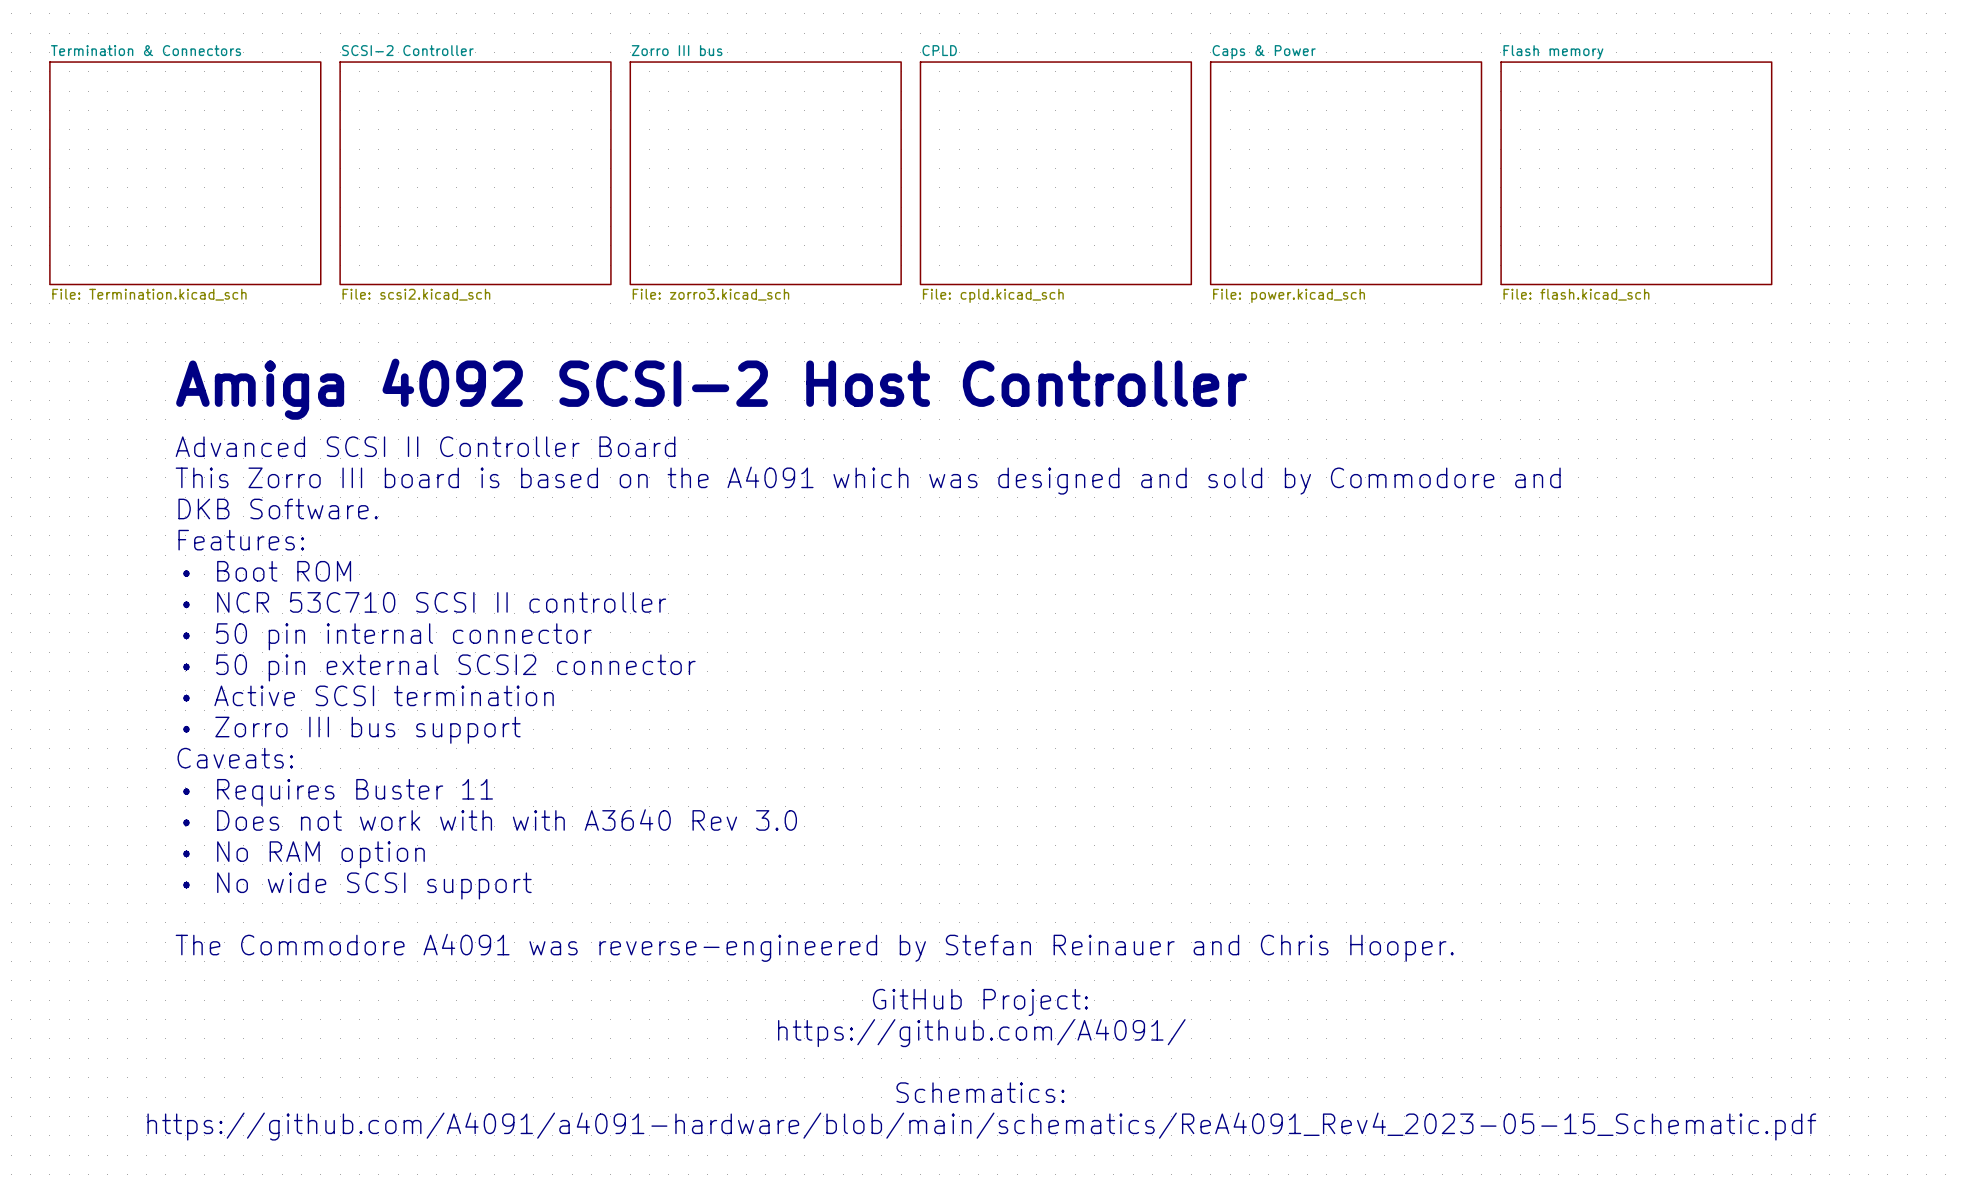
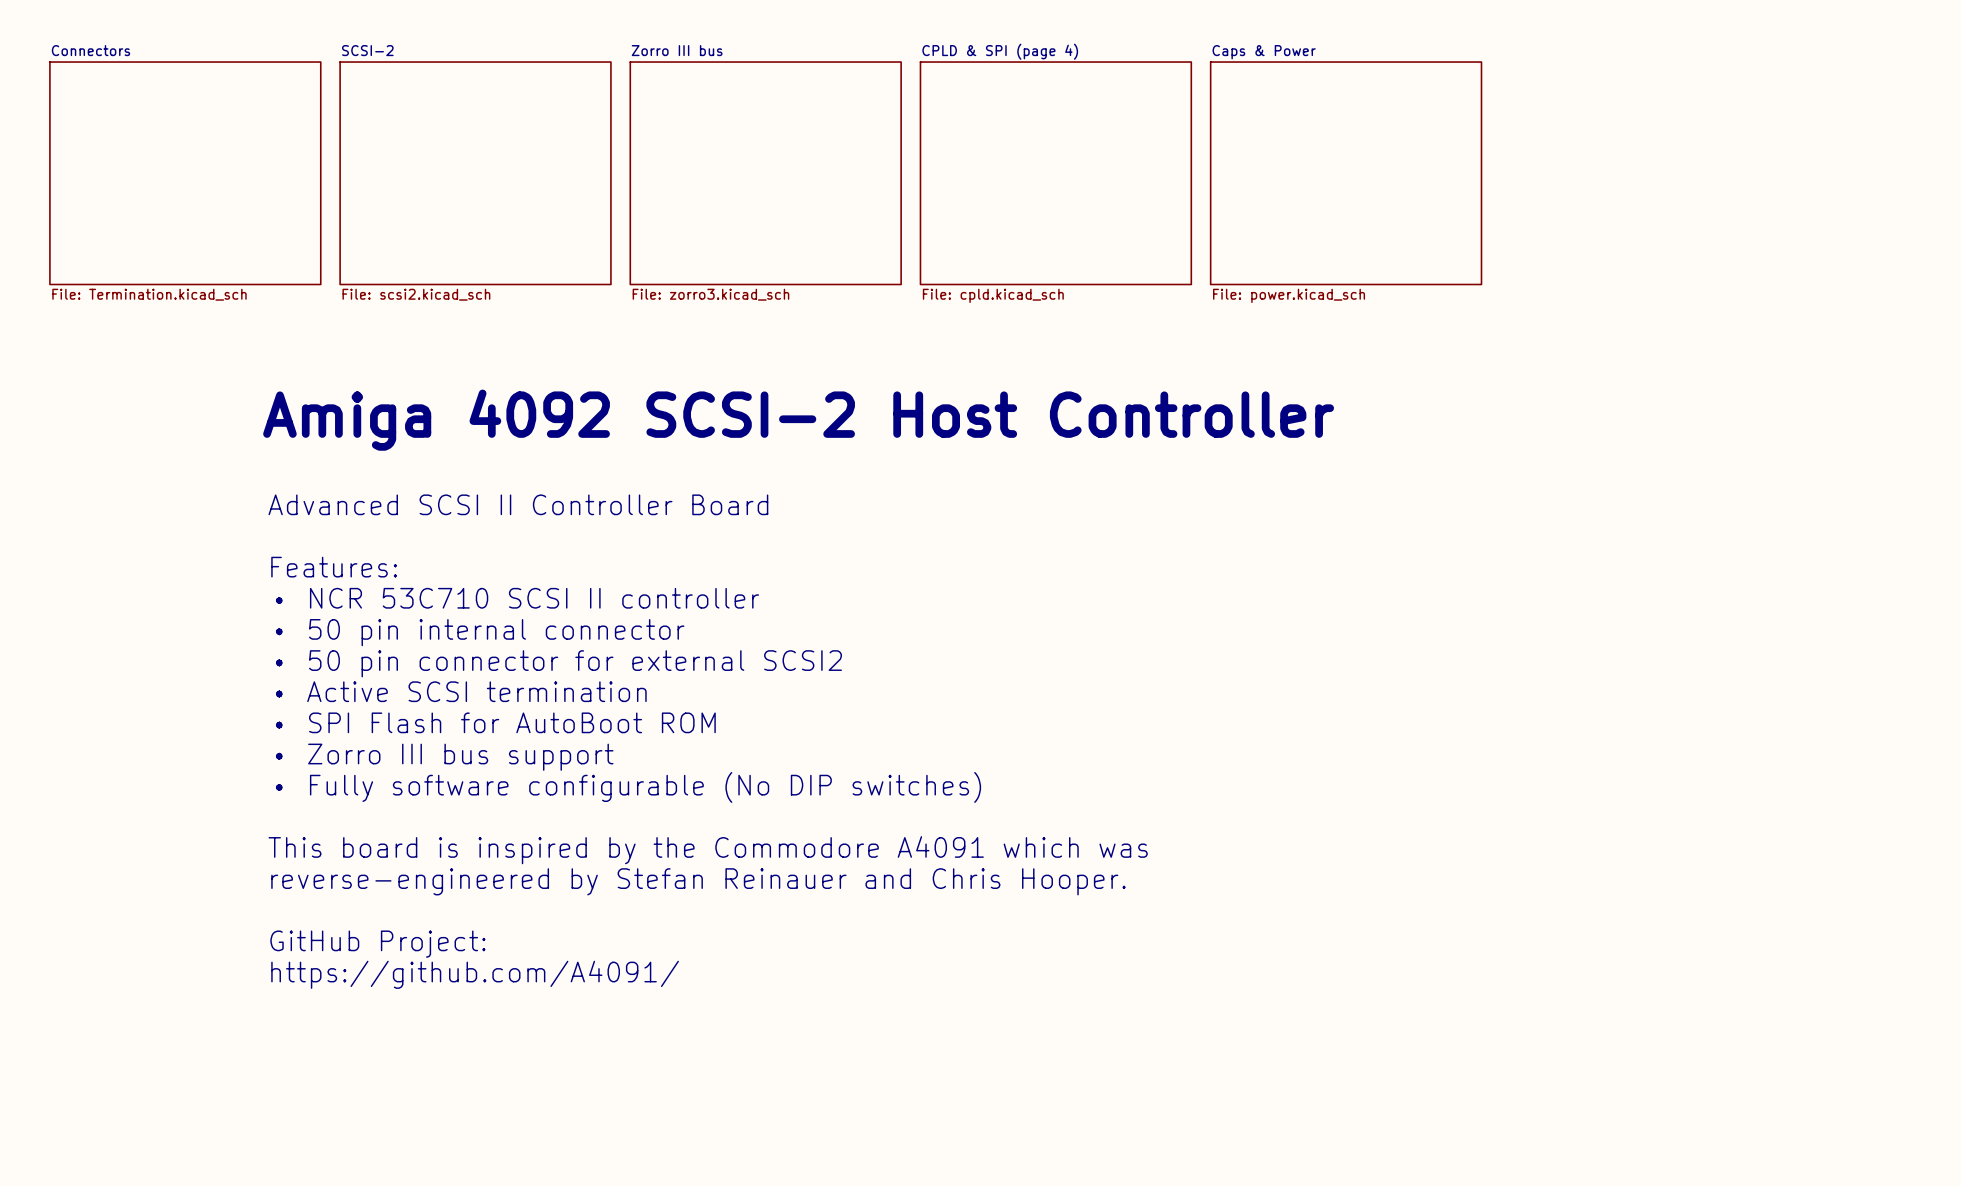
sheet Termination & Connectors name: Termination & Connectors (146, 50) -> Connectors (90, 50)
sheet SCSI-2 Controller name: SCSI-2 Controller (407, 50) -> SCSI-2 (367, 50)
sheet CPLD name: CPLD (939, 50) -> CPLD & SPI (page 4) (1000, 51)
sheet Flash memory: File: flash.kicad_sch (1636, 173) -> none
text position: Amiga 4092 SCSI-2 Host Controller (711, 389) -> Amiga 4092 SCSI-2 Host Controller (798, 420)
text position: Advanced SCSI II Controller Board (425, 446) -> Advanced SCSI II Controller Board (518, 504)
text: This Zorro III board is based on the A4091 which was designed and sold by Commodore and (868, 480) -> none
text: DKB Software. (278, 508) -> none
text position: Features: (241, 540) -> Features: (334, 567)
text: • Boot ROM (267, 571) -> none
text position: • NCR 53C710 SCSI II controller (424, 602) -> • NCR 53C710 SCSI II controller (517, 598)
text position: • 50 pin internal connector (387, 636) -> • 50 pin internal connector (480, 632)
text: • 50 pin external SCSI2 connector (439, 667) -> • 50 pin connector for external SCSI2 (558, 663)
text position: • Active SCSI termination (368, 695) -> • Active SCSI termination (461, 691)
text: none -> • SPI Flash for AutoBoot ROM (495, 722)
text position: • Zorro III bus support (351, 730) -> • Zorro III bus support (444, 757)
text: Caveats: (235, 758) -> none
text: none -> • Fully software configurable (No DIP switches) (628, 787)
text: • Requires Buster 11 (338, 792) -> none
text: • Does not work with with A3640 Rev 3.0 (490, 819) -> none
text: none -> This board is inspired by the Commodore A4091 which was (708, 850)
text: • No RAM option (303, 854) -> none
text: none -> reverse-engineered by Stefan Reinauer and Chris Hooper. (698, 881)
text: • No wide SCSI support (357, 885) -> none
text: none -> GitHub Project: (377, 944)
text: The Commodore A4091 was reverse-engineered by Stefan Reinauer and Chris Hooper. (814, 947) -> none
text: none -> https://github.com/A4091/ (475, 974)
text: GitHub Project: (980, 1002) -> none
text: https://github.com/A4091/ (981, 1033) -> none
text: Schematics: (980, 1092) -> none
text: https://github.com/A4091/a4091-hardware/blob/main/schematics/ReA4091_Rev4_2023-05-15_Schematic.pdf (981, 1126) -> none

